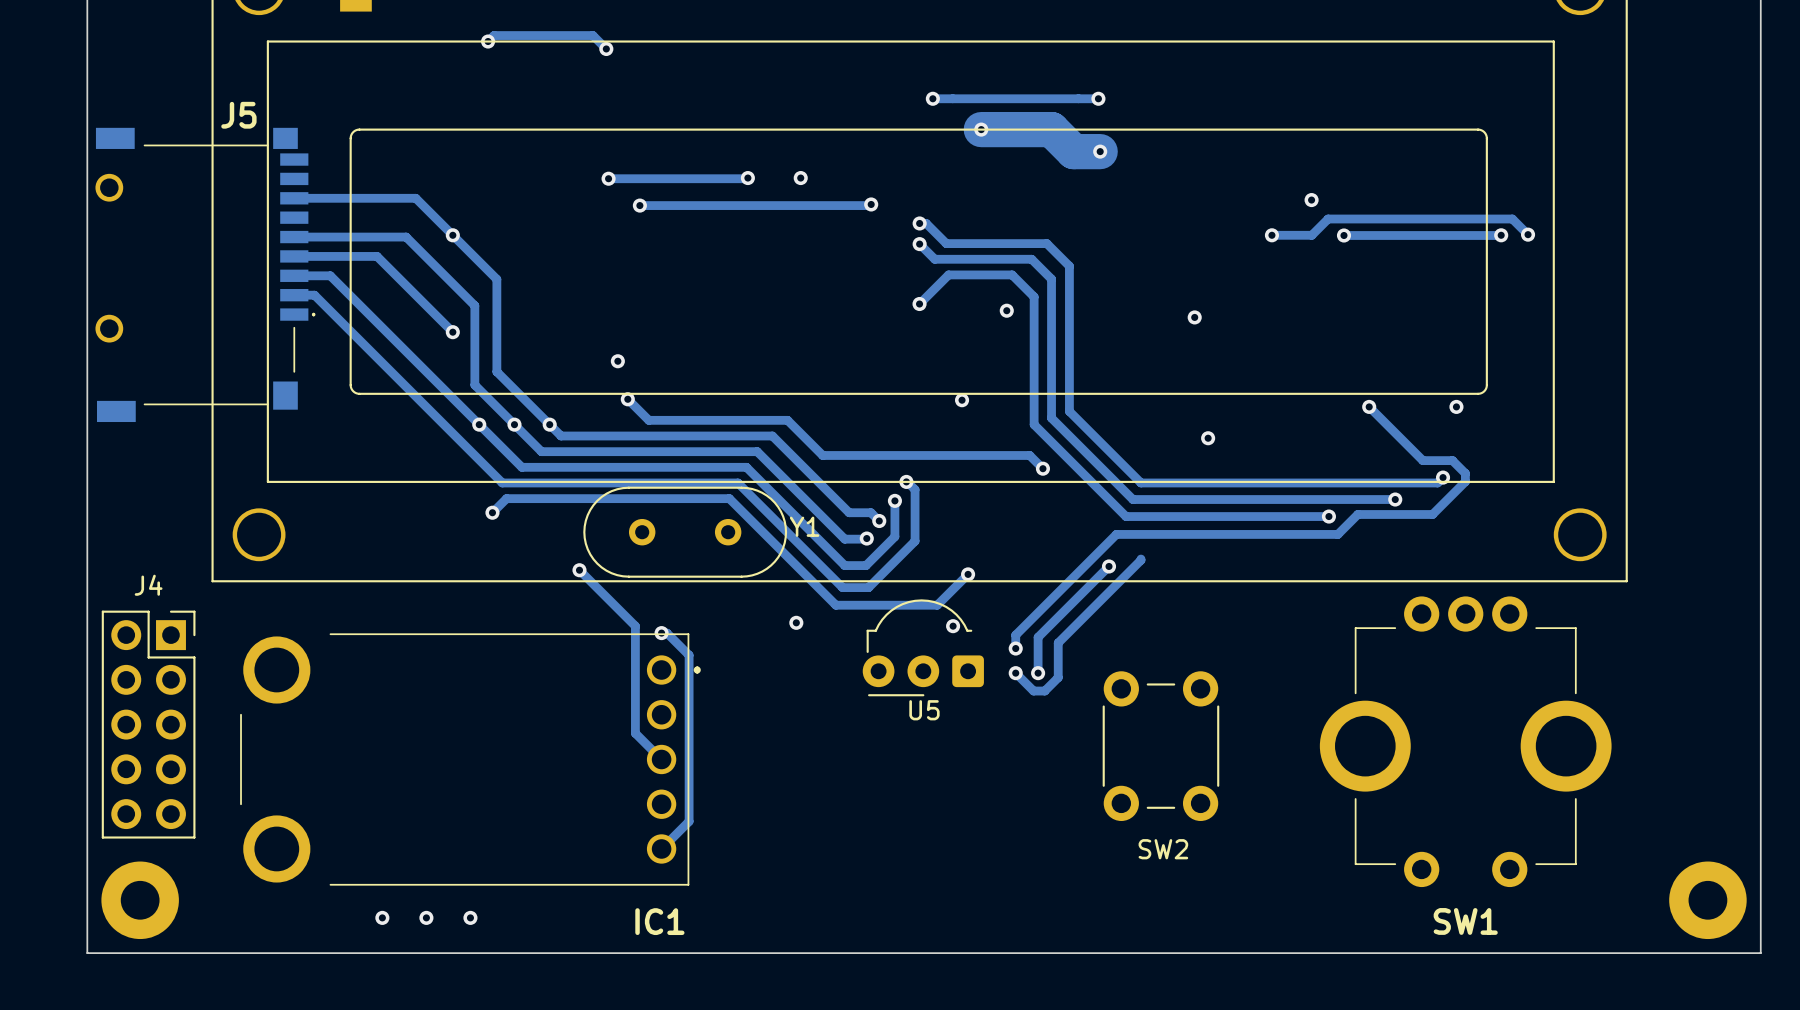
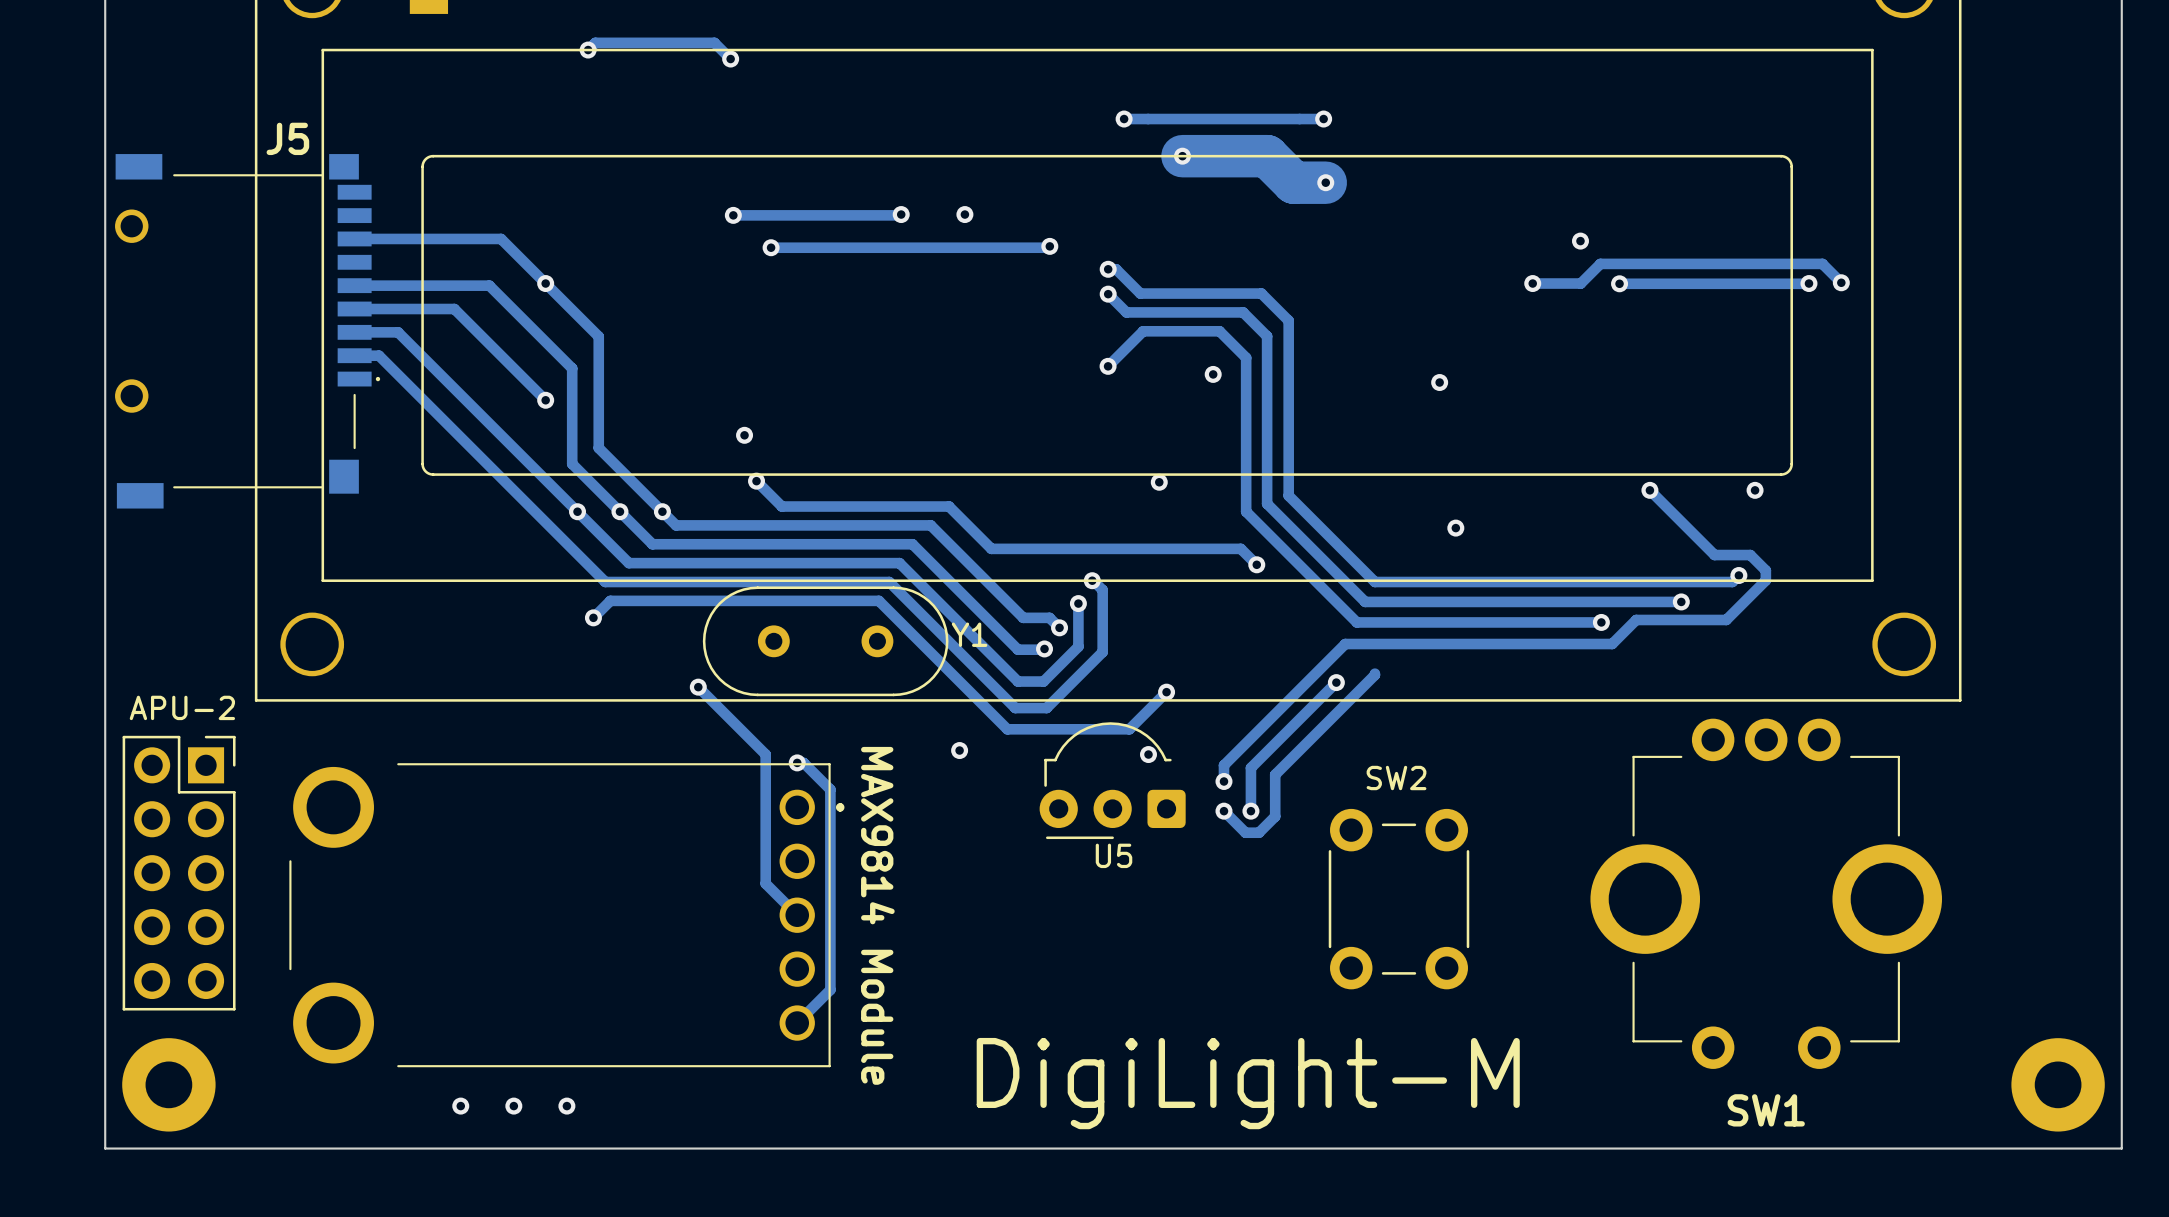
J4 name: J4 (148, 585) -> none
J4 value: none -> APU-2 (182, 707)
IC1 value: none -> MAX9814 Module (877, 915)
SW2 name position: SW2 (1163, 849) -> SW2 (1396, 778)
text: none -> DigiLight-M (1248, 1083)
IC1 name: IC1 (659, 921) -> none

